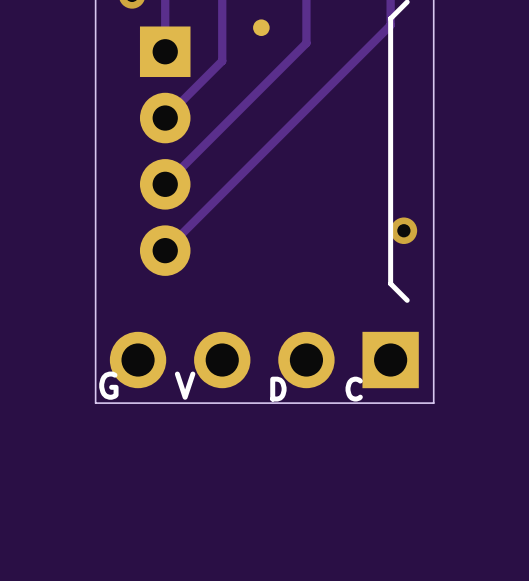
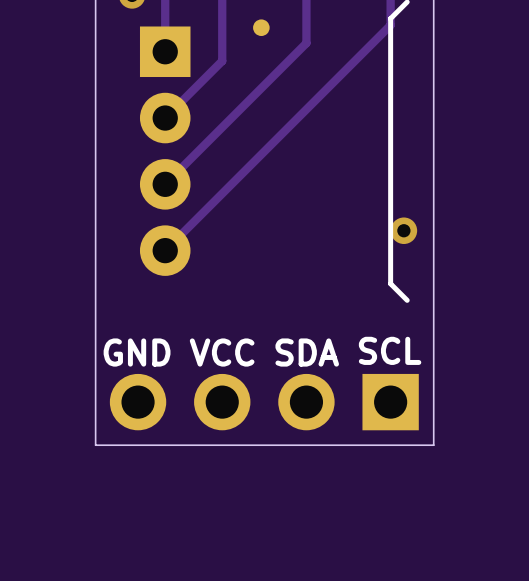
text: none -> SCL (390, 350)
text: none -> GND (137, 352)
text: none -> VCC (222, 352)
text: none -> SDA (307, 352)
part position: (264, 360) -> (264, 402)
text: G (108, 385) -> none
text: V (185, 385) -> none
text: D (278, 389) -> none
text: C (354, 389) -> none
board edge: (95, 403) (433, 403) -> (95, 403) (95, 445) (433, 445) (433, 403)

